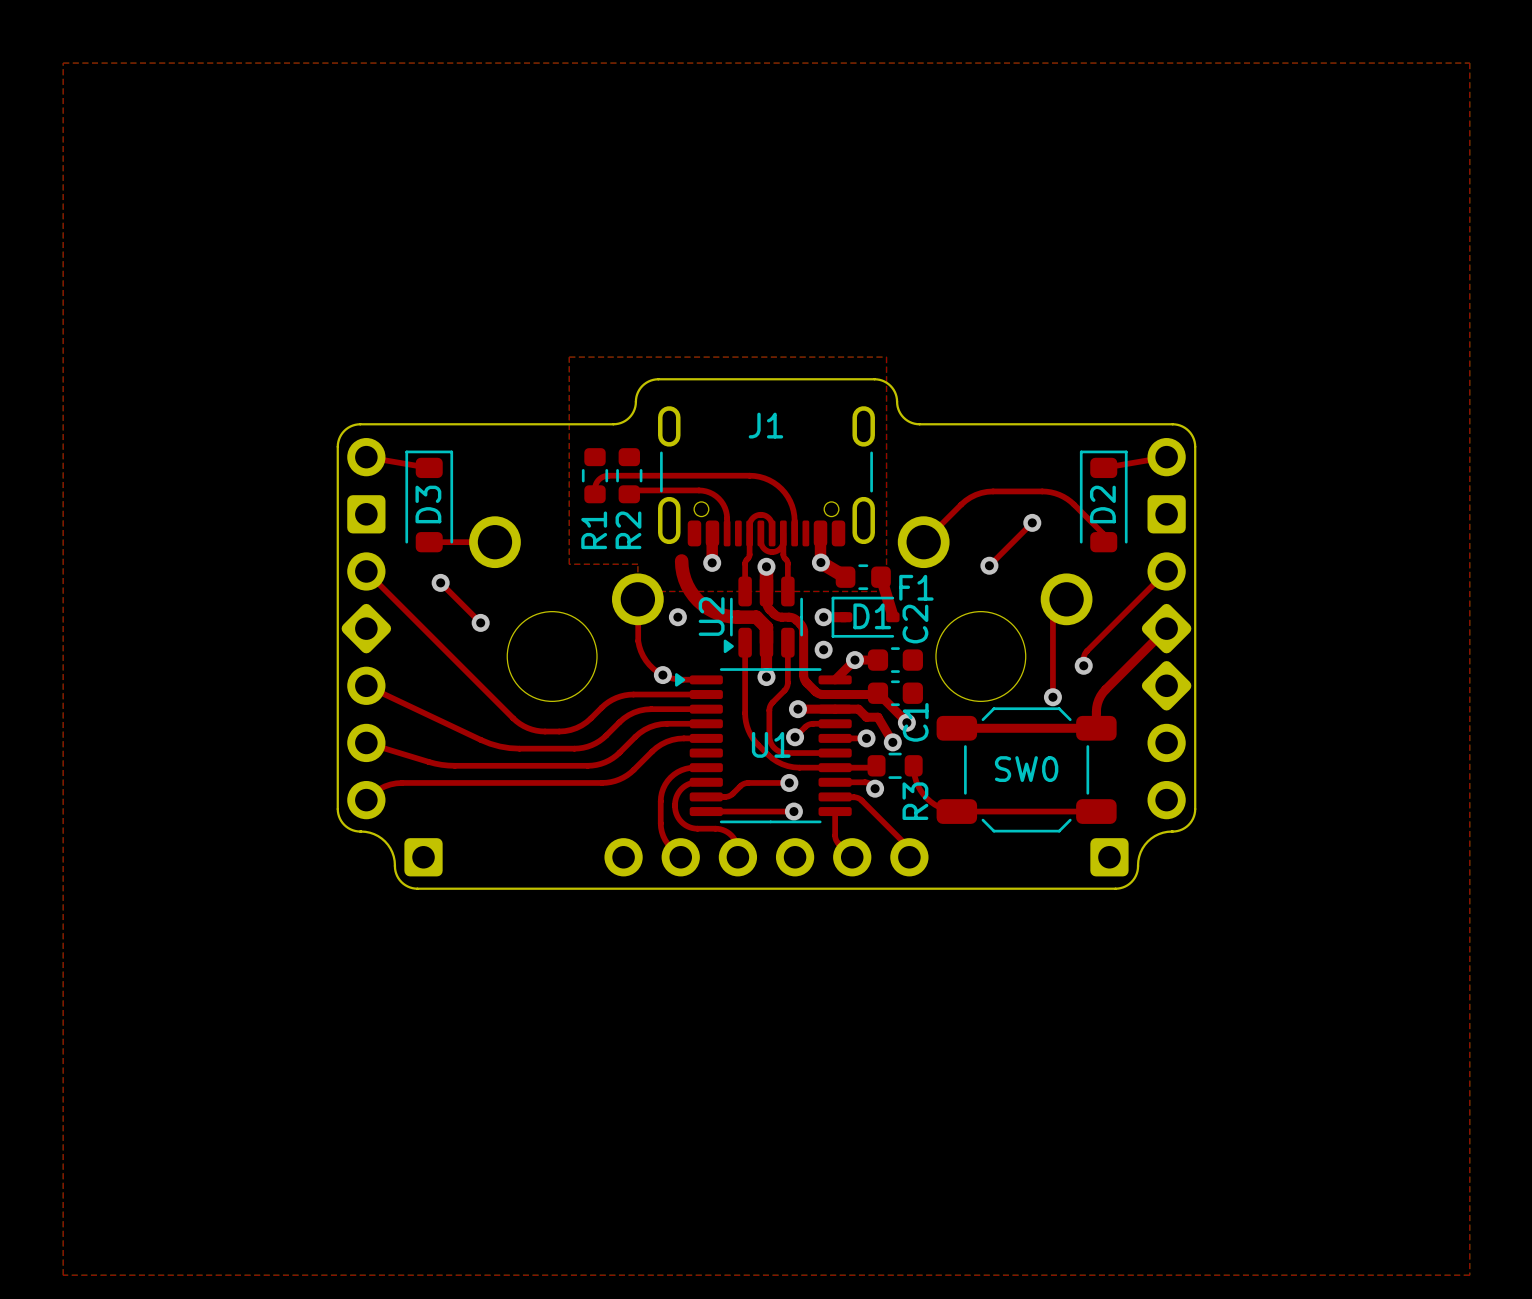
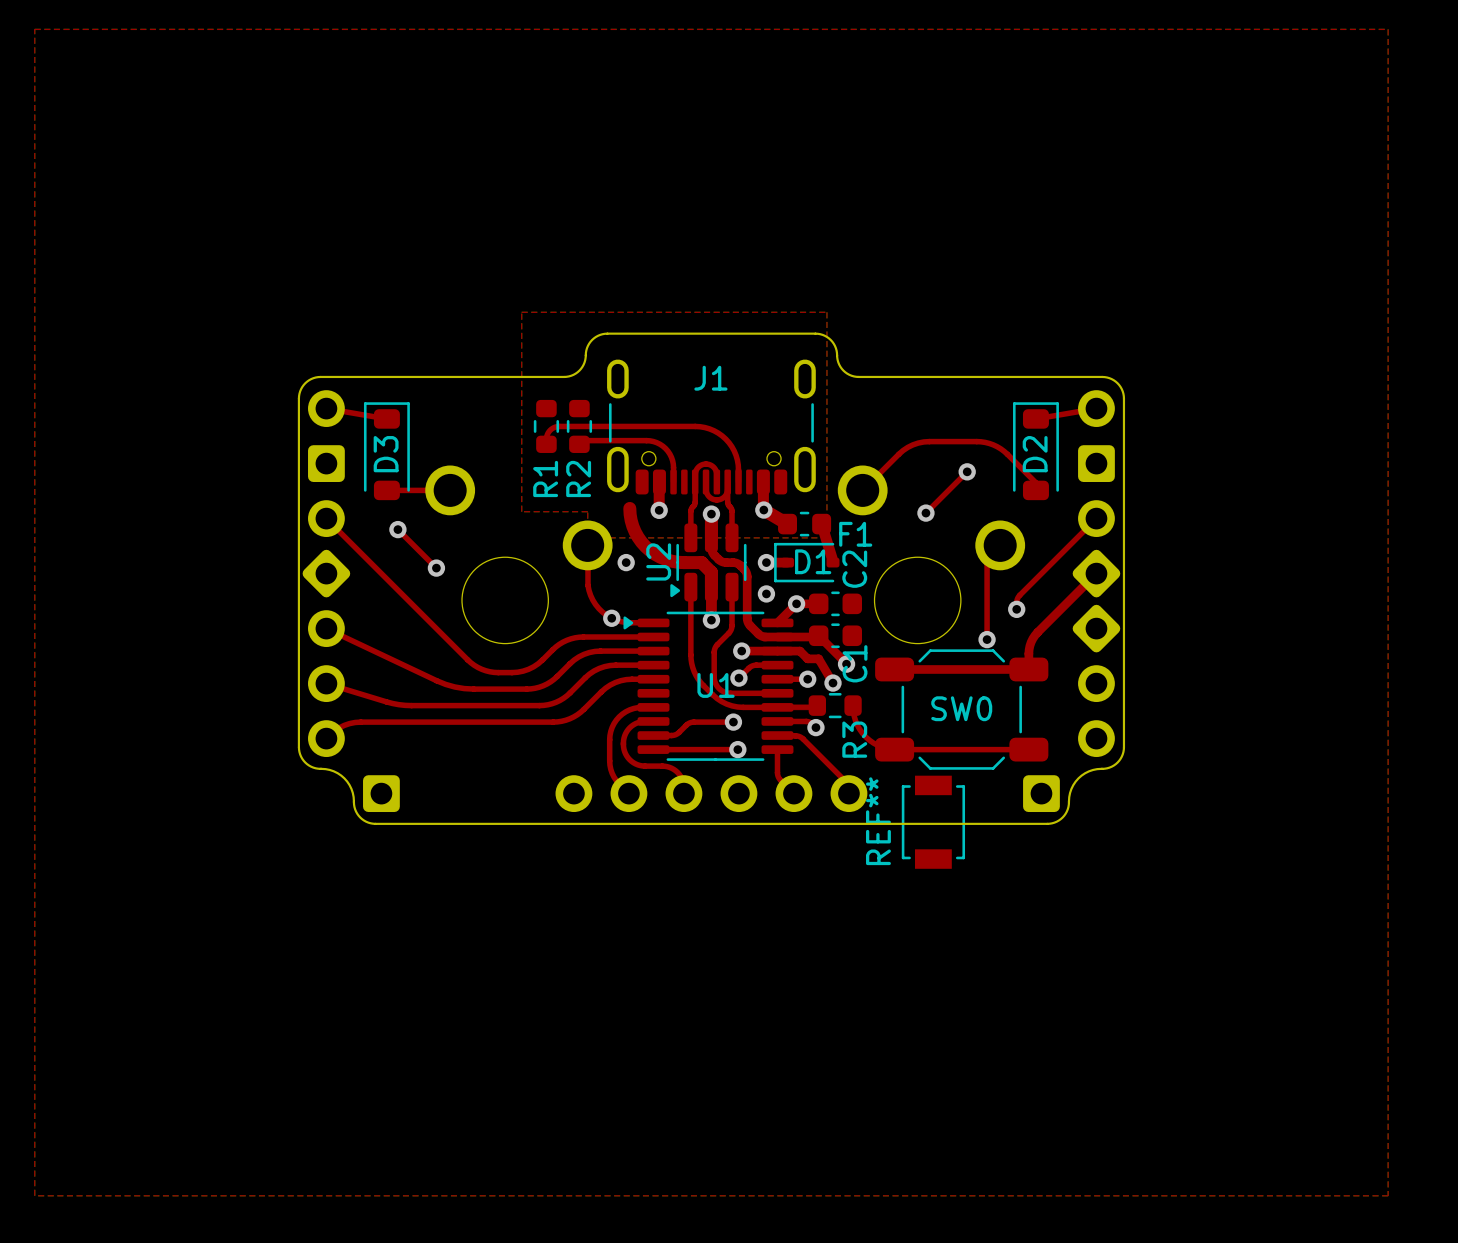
REF**: none -> (933, 822)

